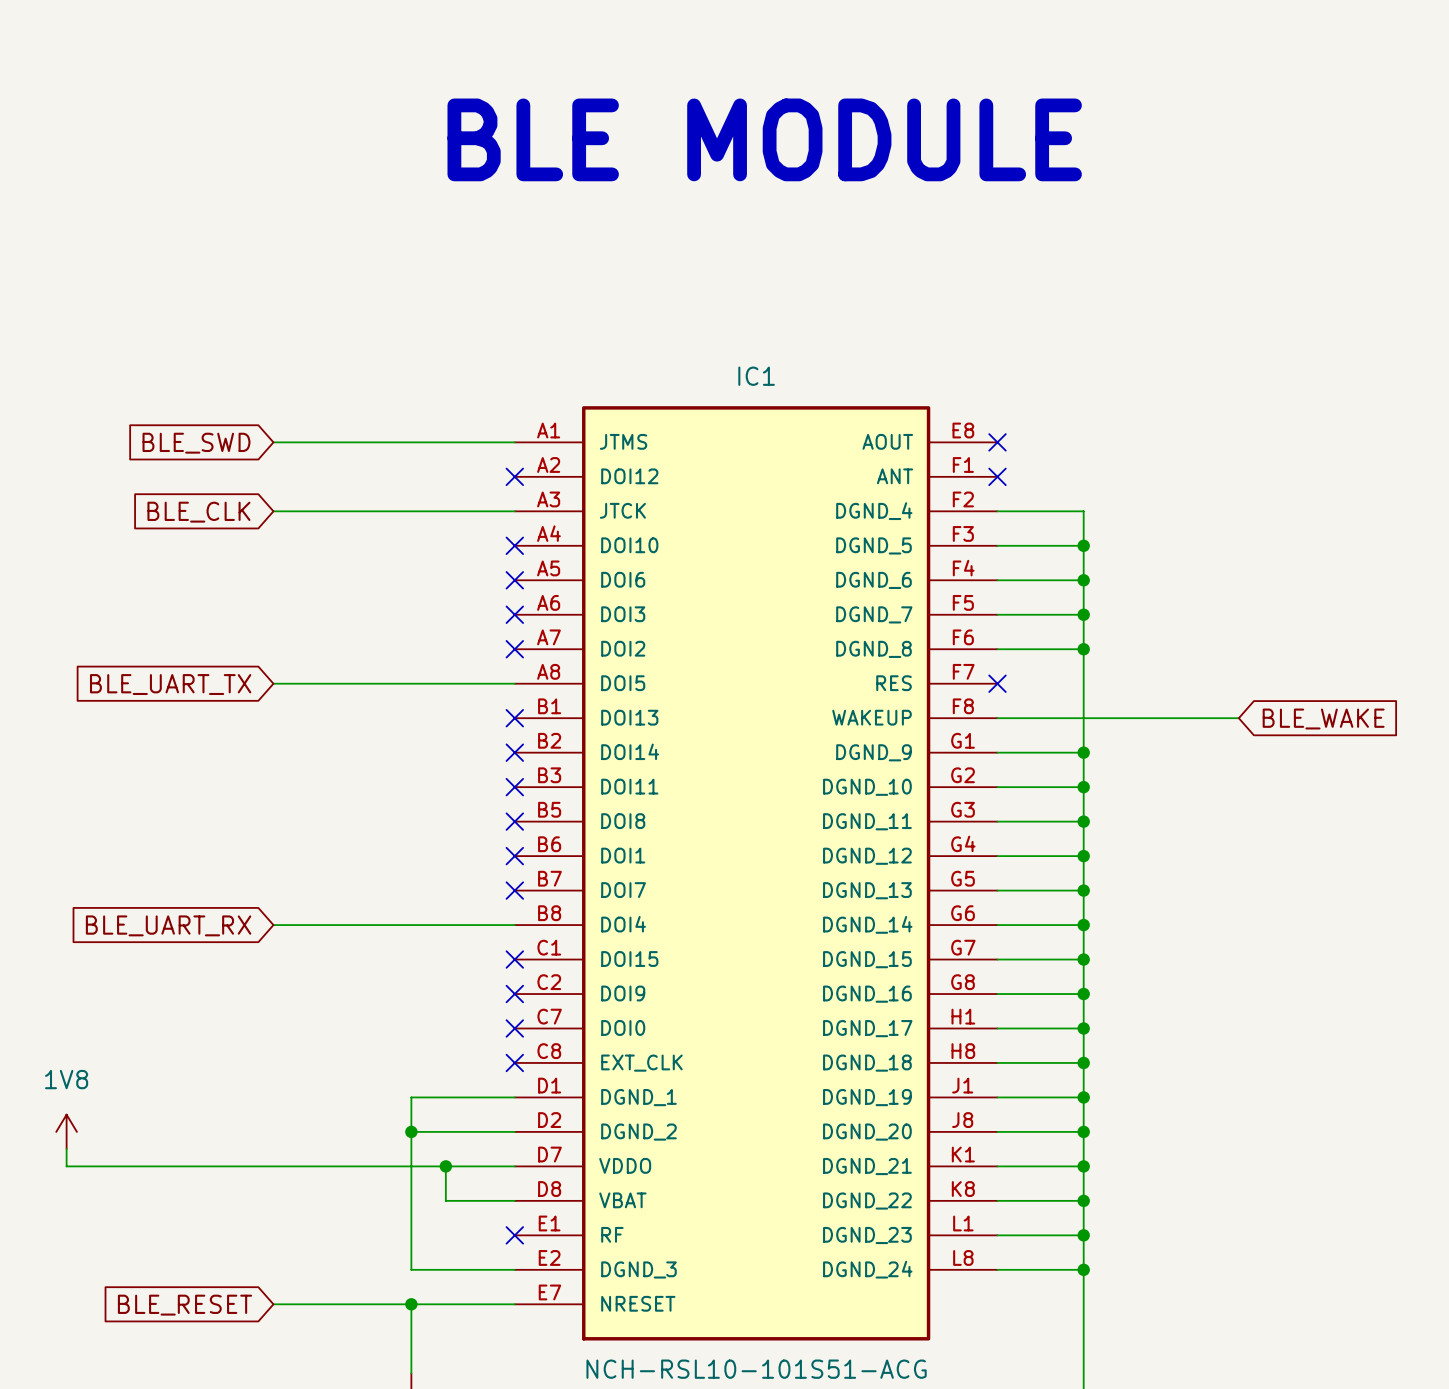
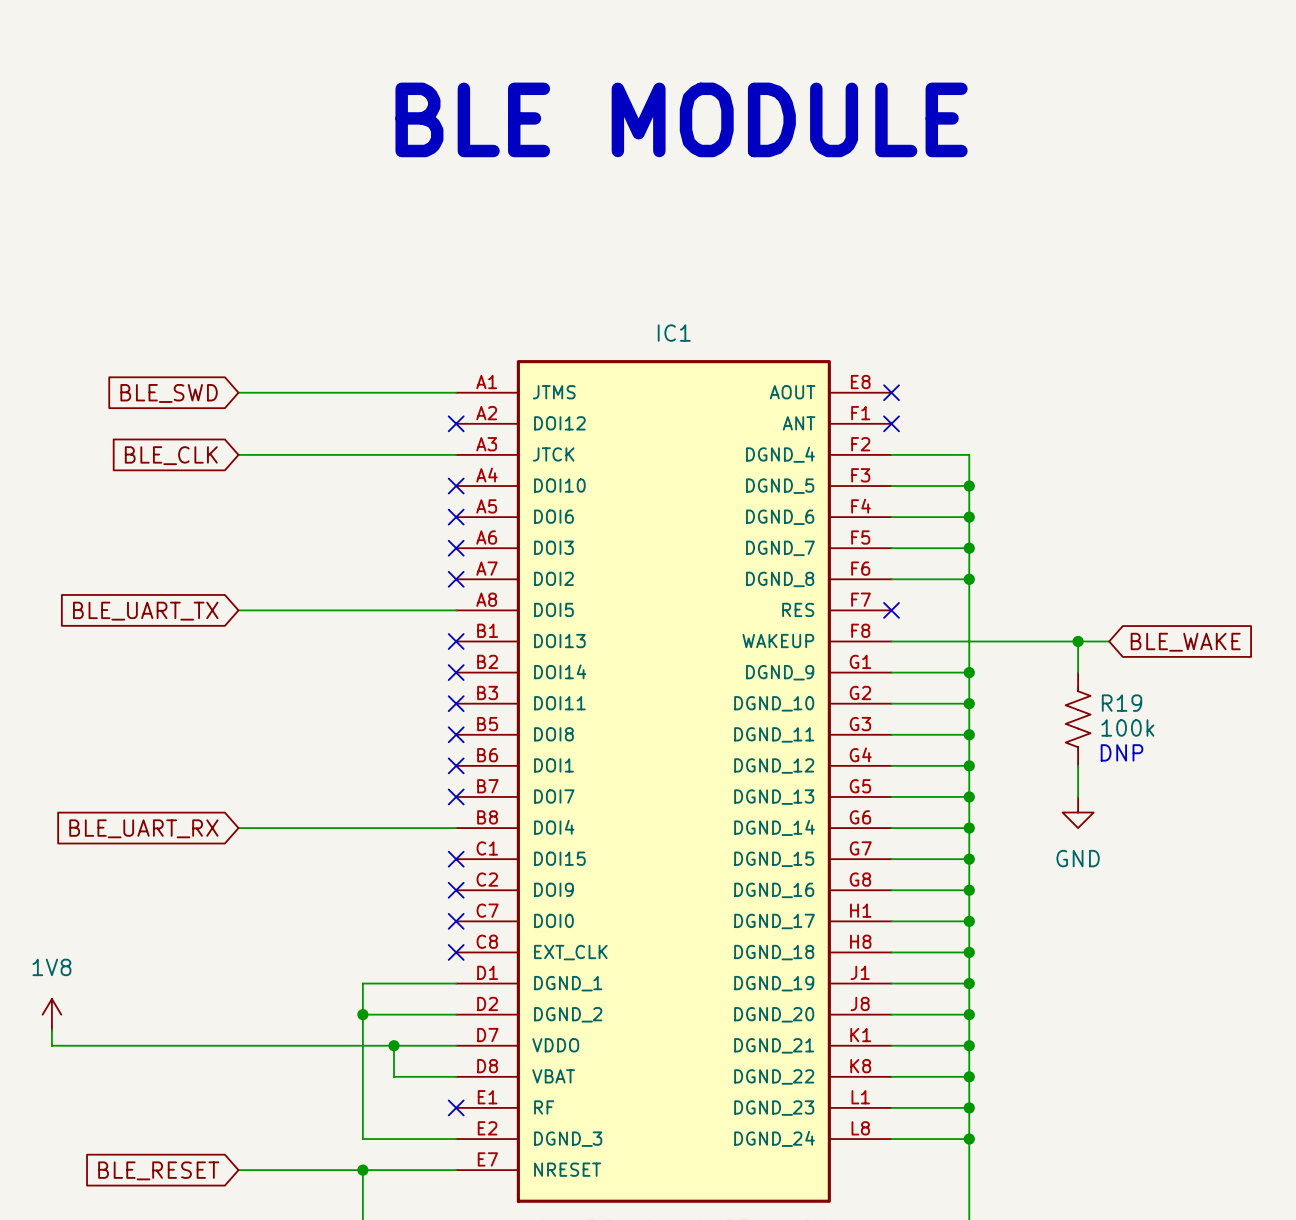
wire: none -> (1078, 641) (1078, 672)
junction: none -> (1078, 641)
R19: none -> 100k (1078, 719)
text: none -> DNP (1122, 752)
wire: none -> (1078, 765) (1078, 796)
power symbol: none -> GND (1078, 812)

